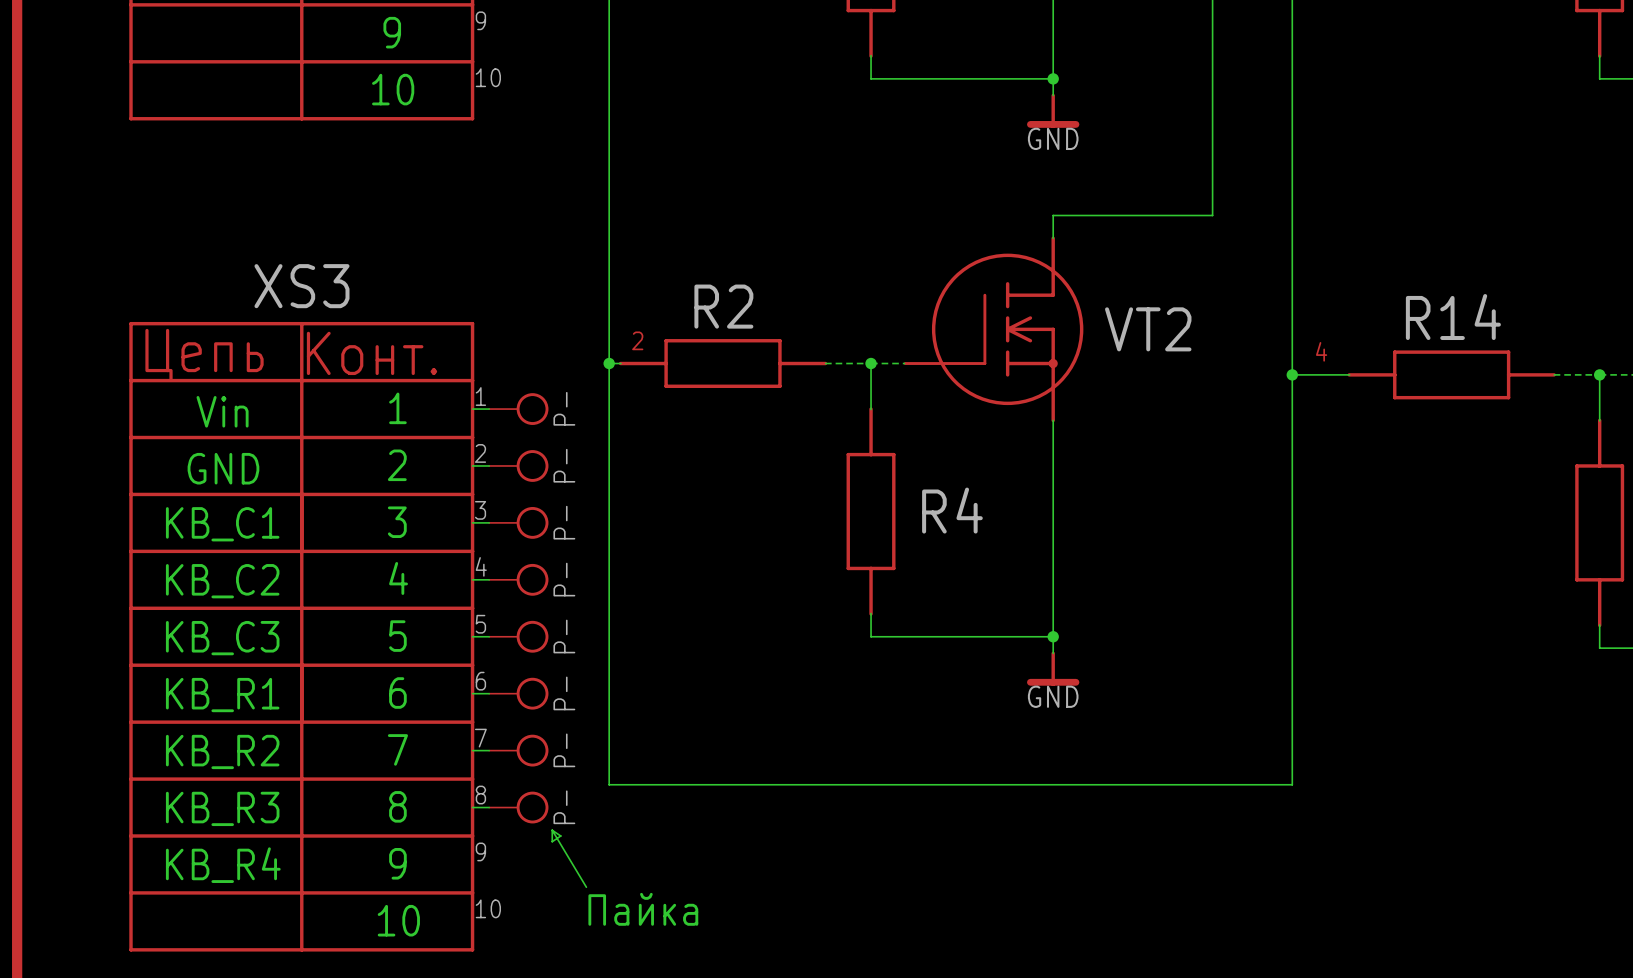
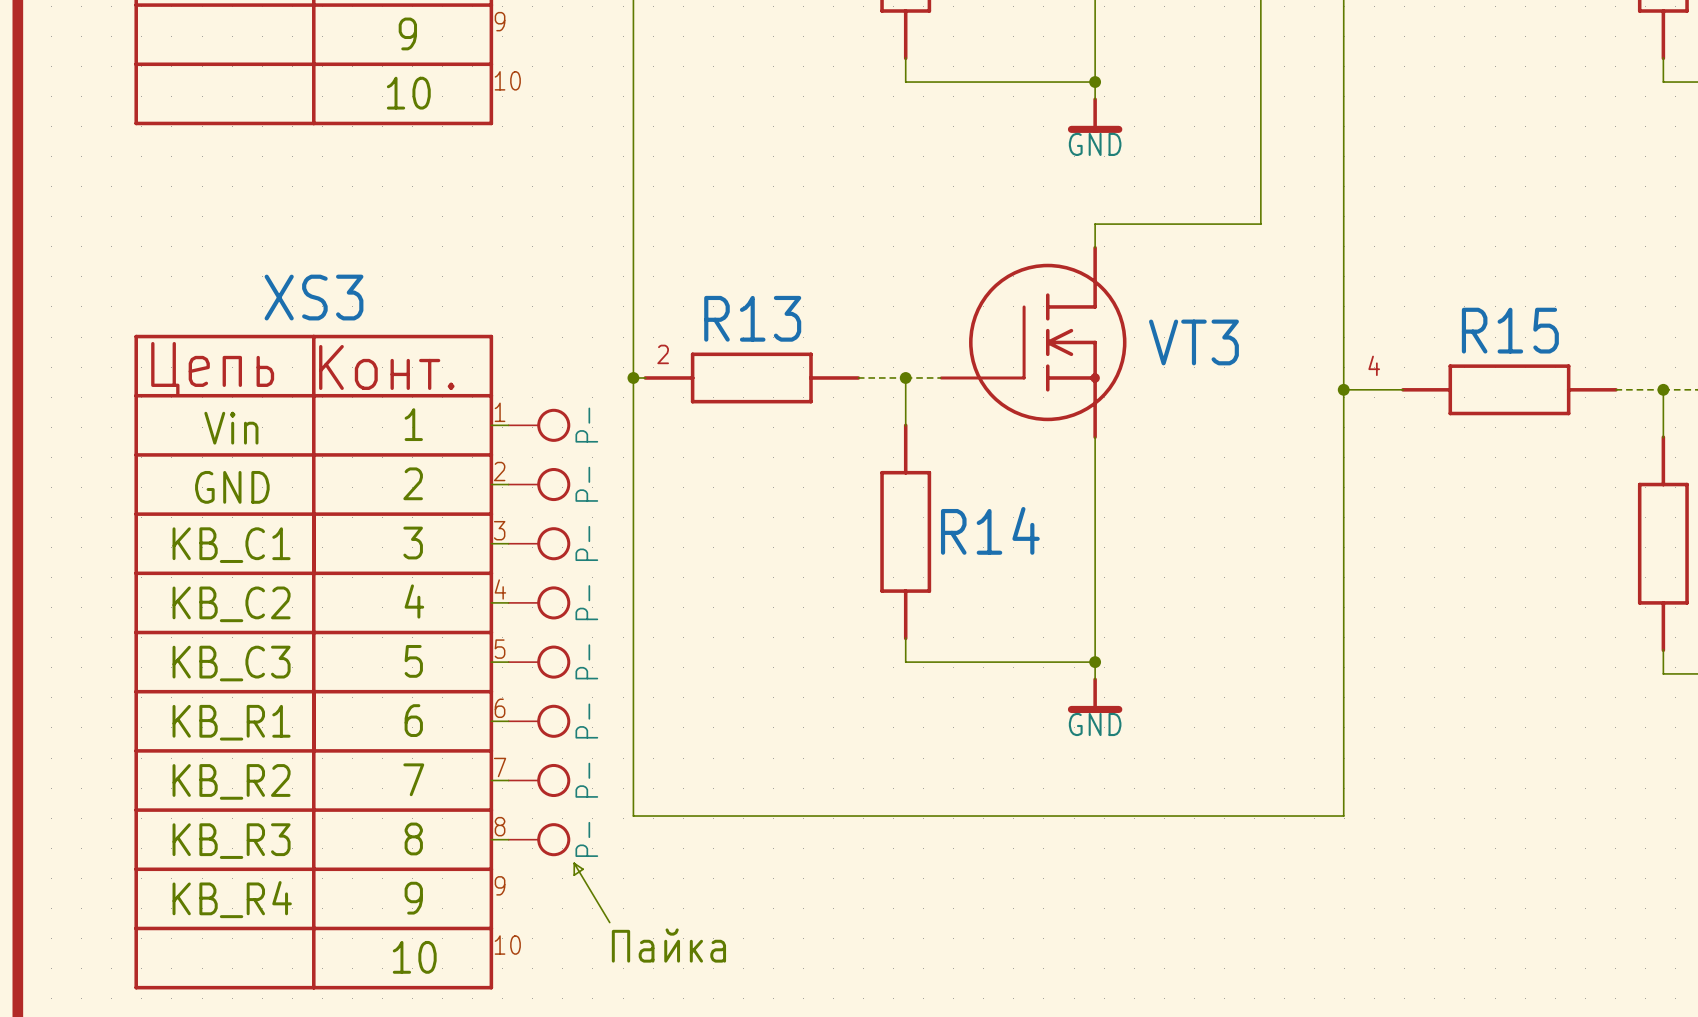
R2 name: R2 (723, 306) -> R13 (752, 318)
R14 name: R14 (1453, 317) -> R15 (1510, 330)
VT2 name: VT2 (1148, 329) -> VT3 (1193, 342)
R4 name: R4 (952, 510) -> R14 (990, 530)

